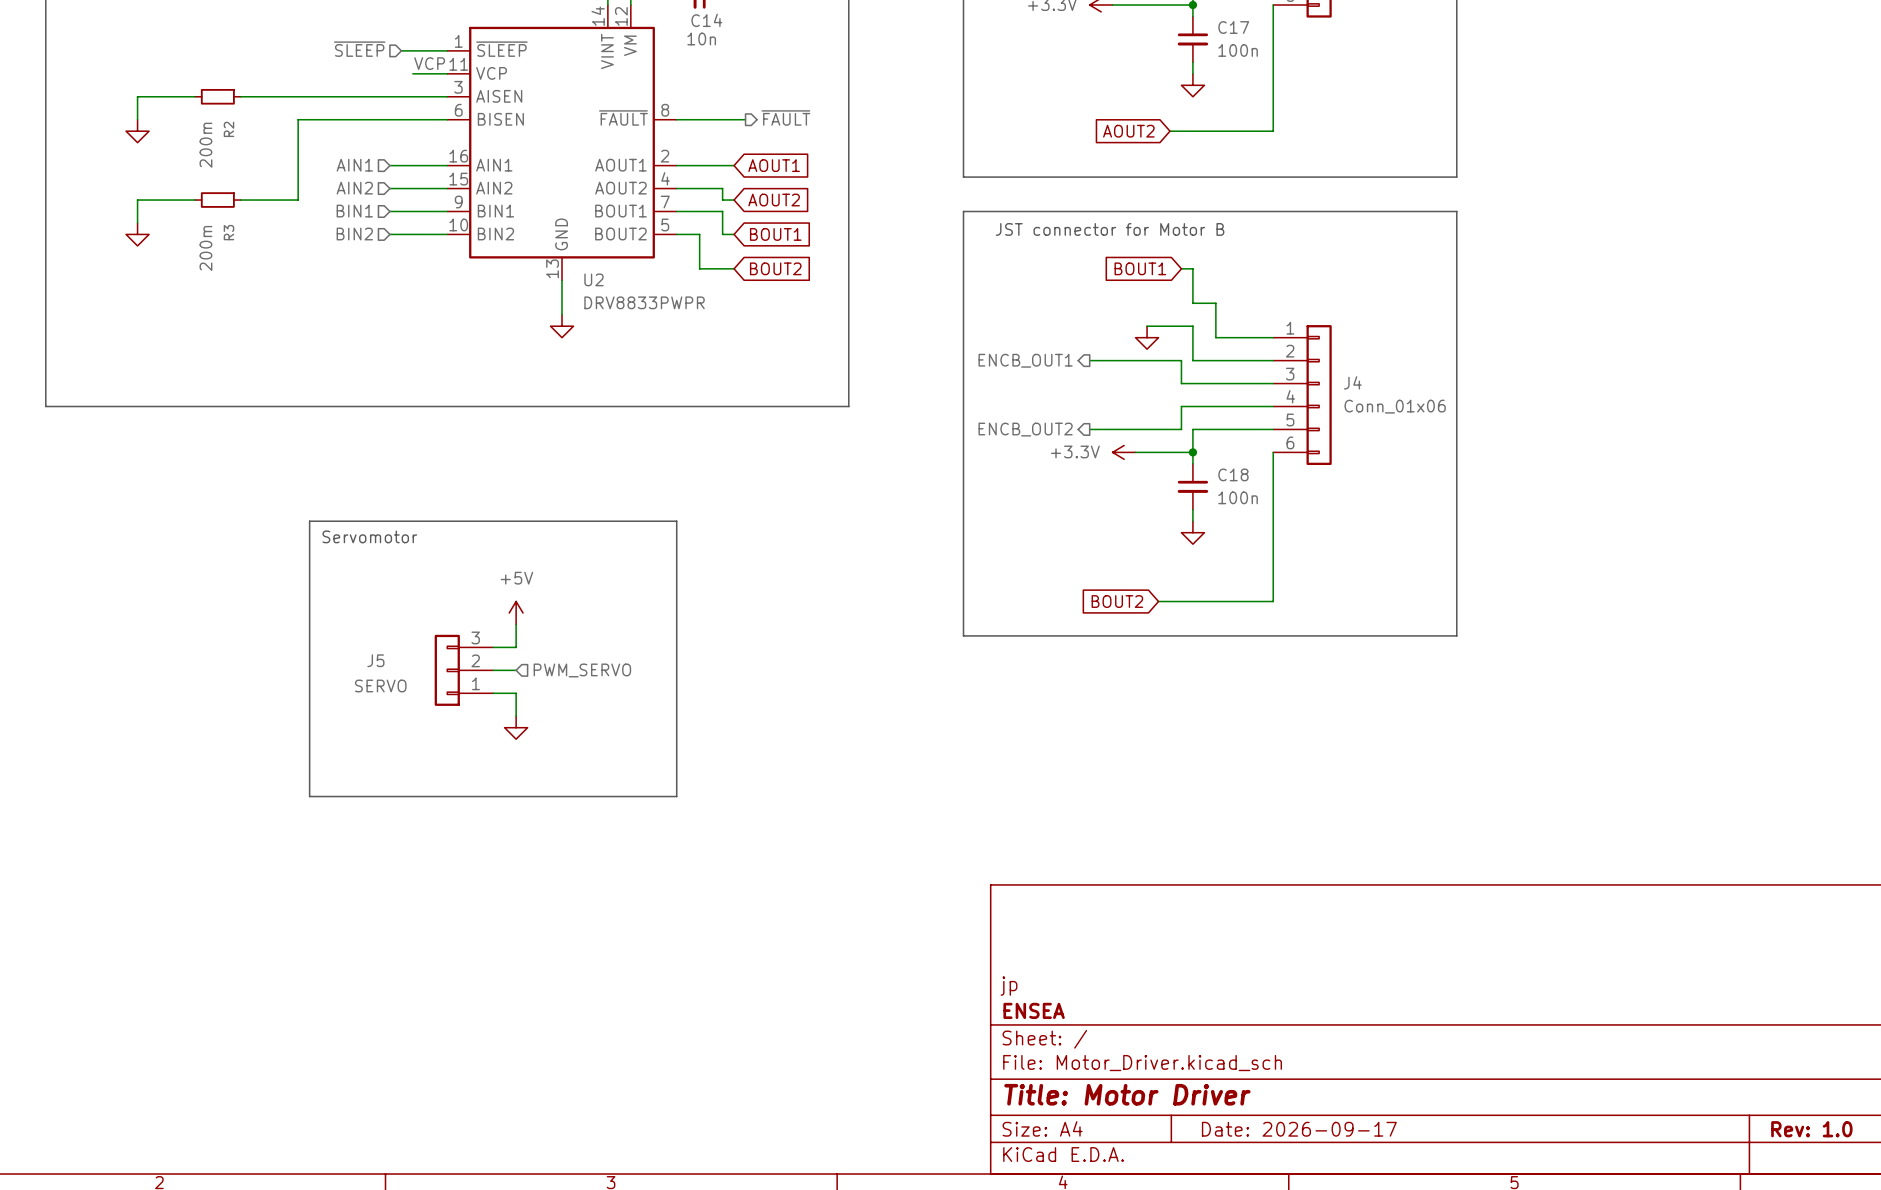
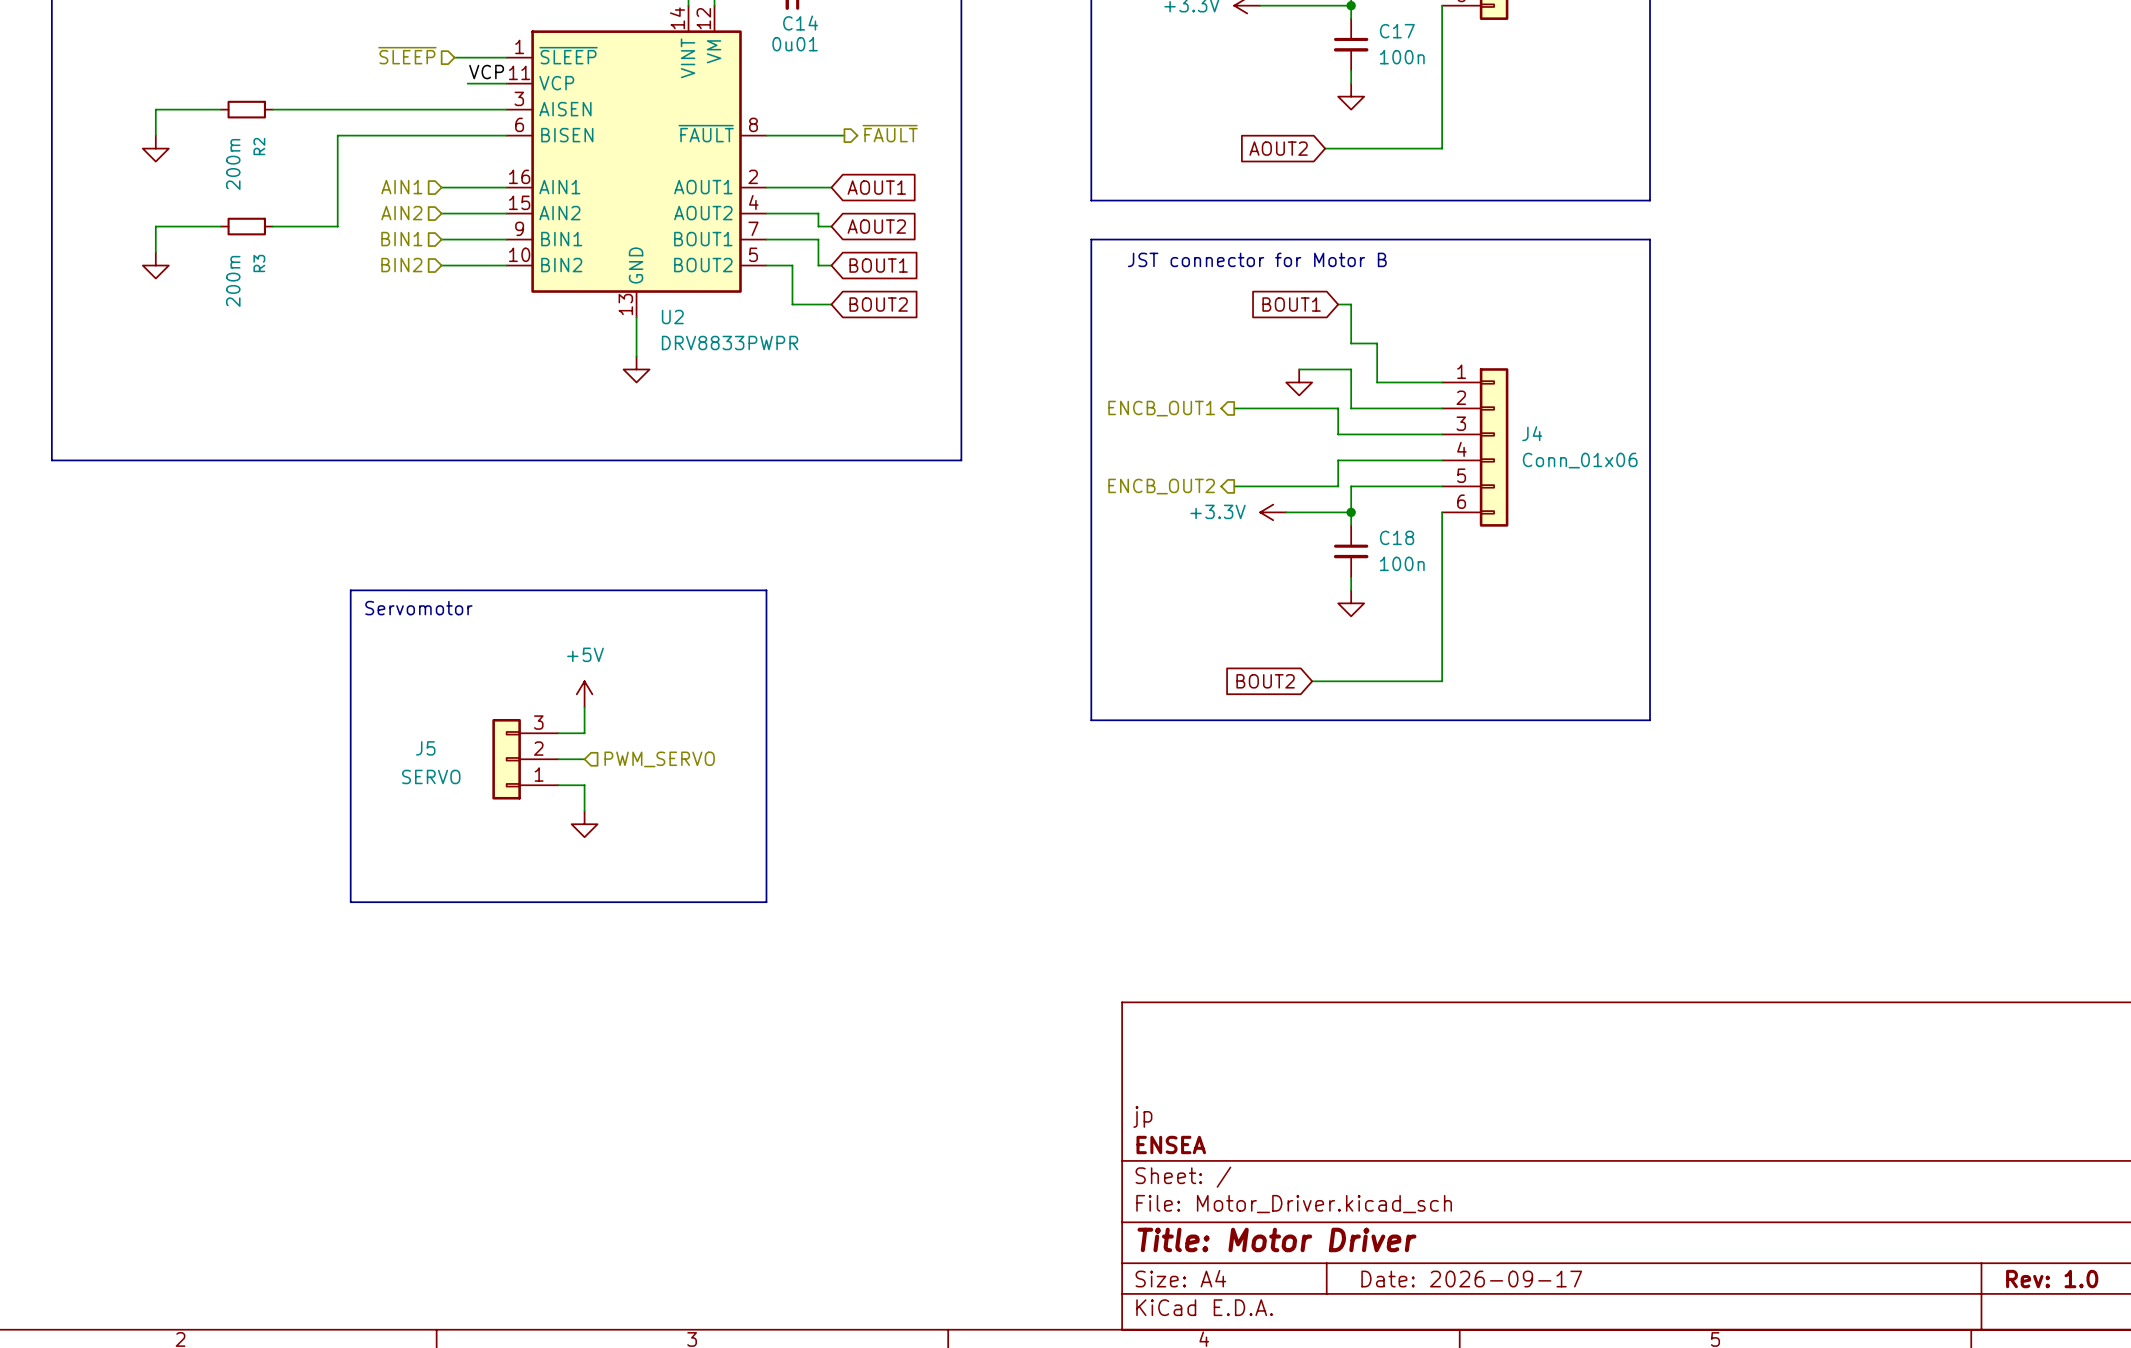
C14 value: 10n (701, 38) -> 0u01 (795, 44)

